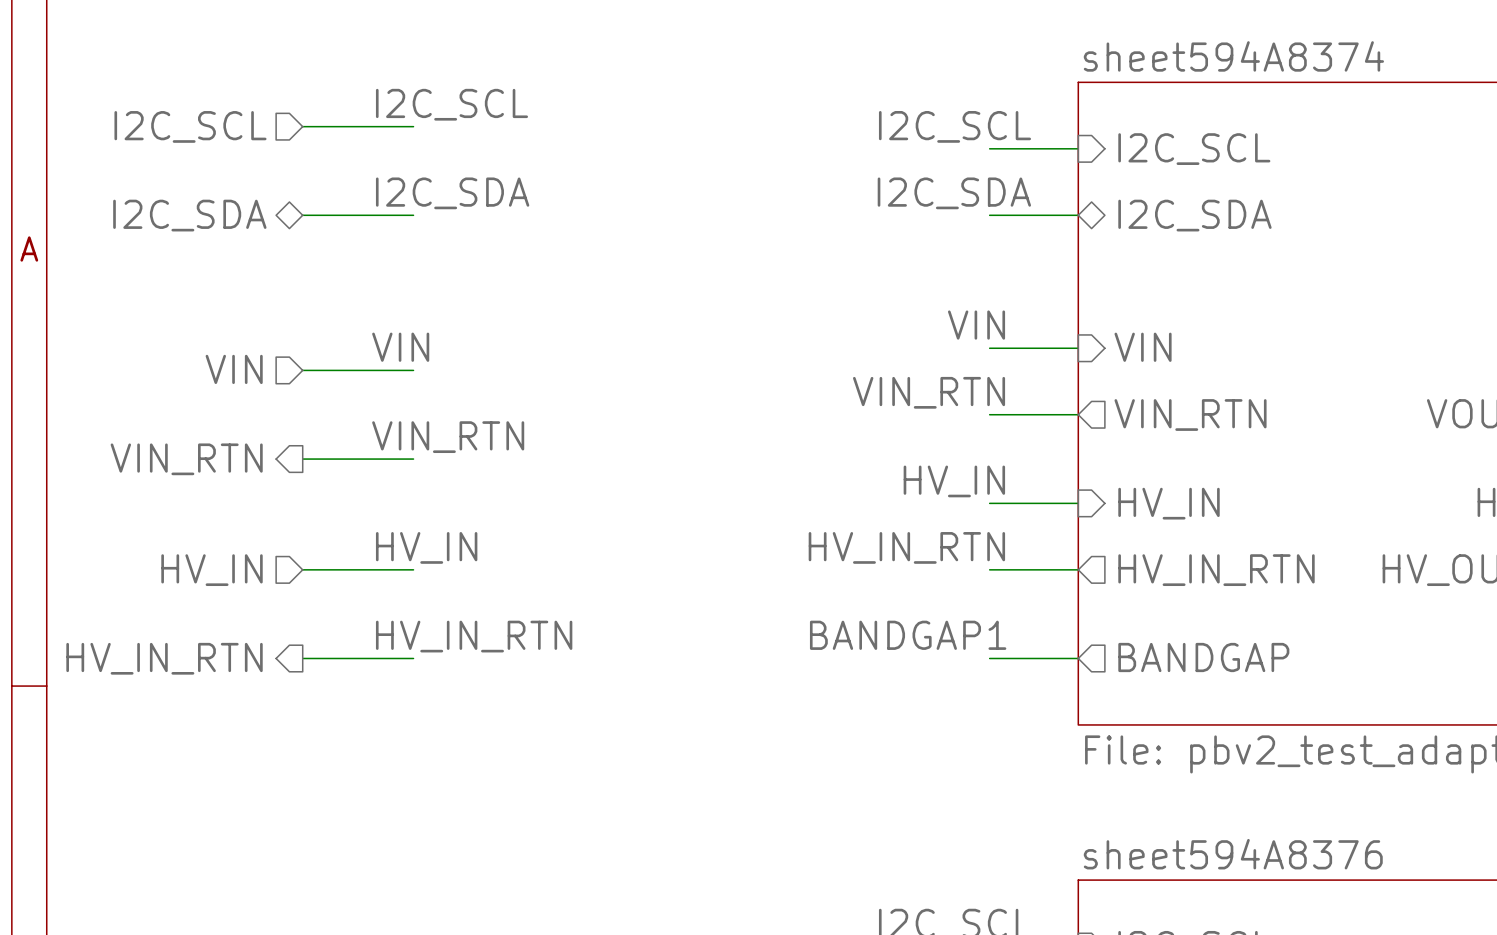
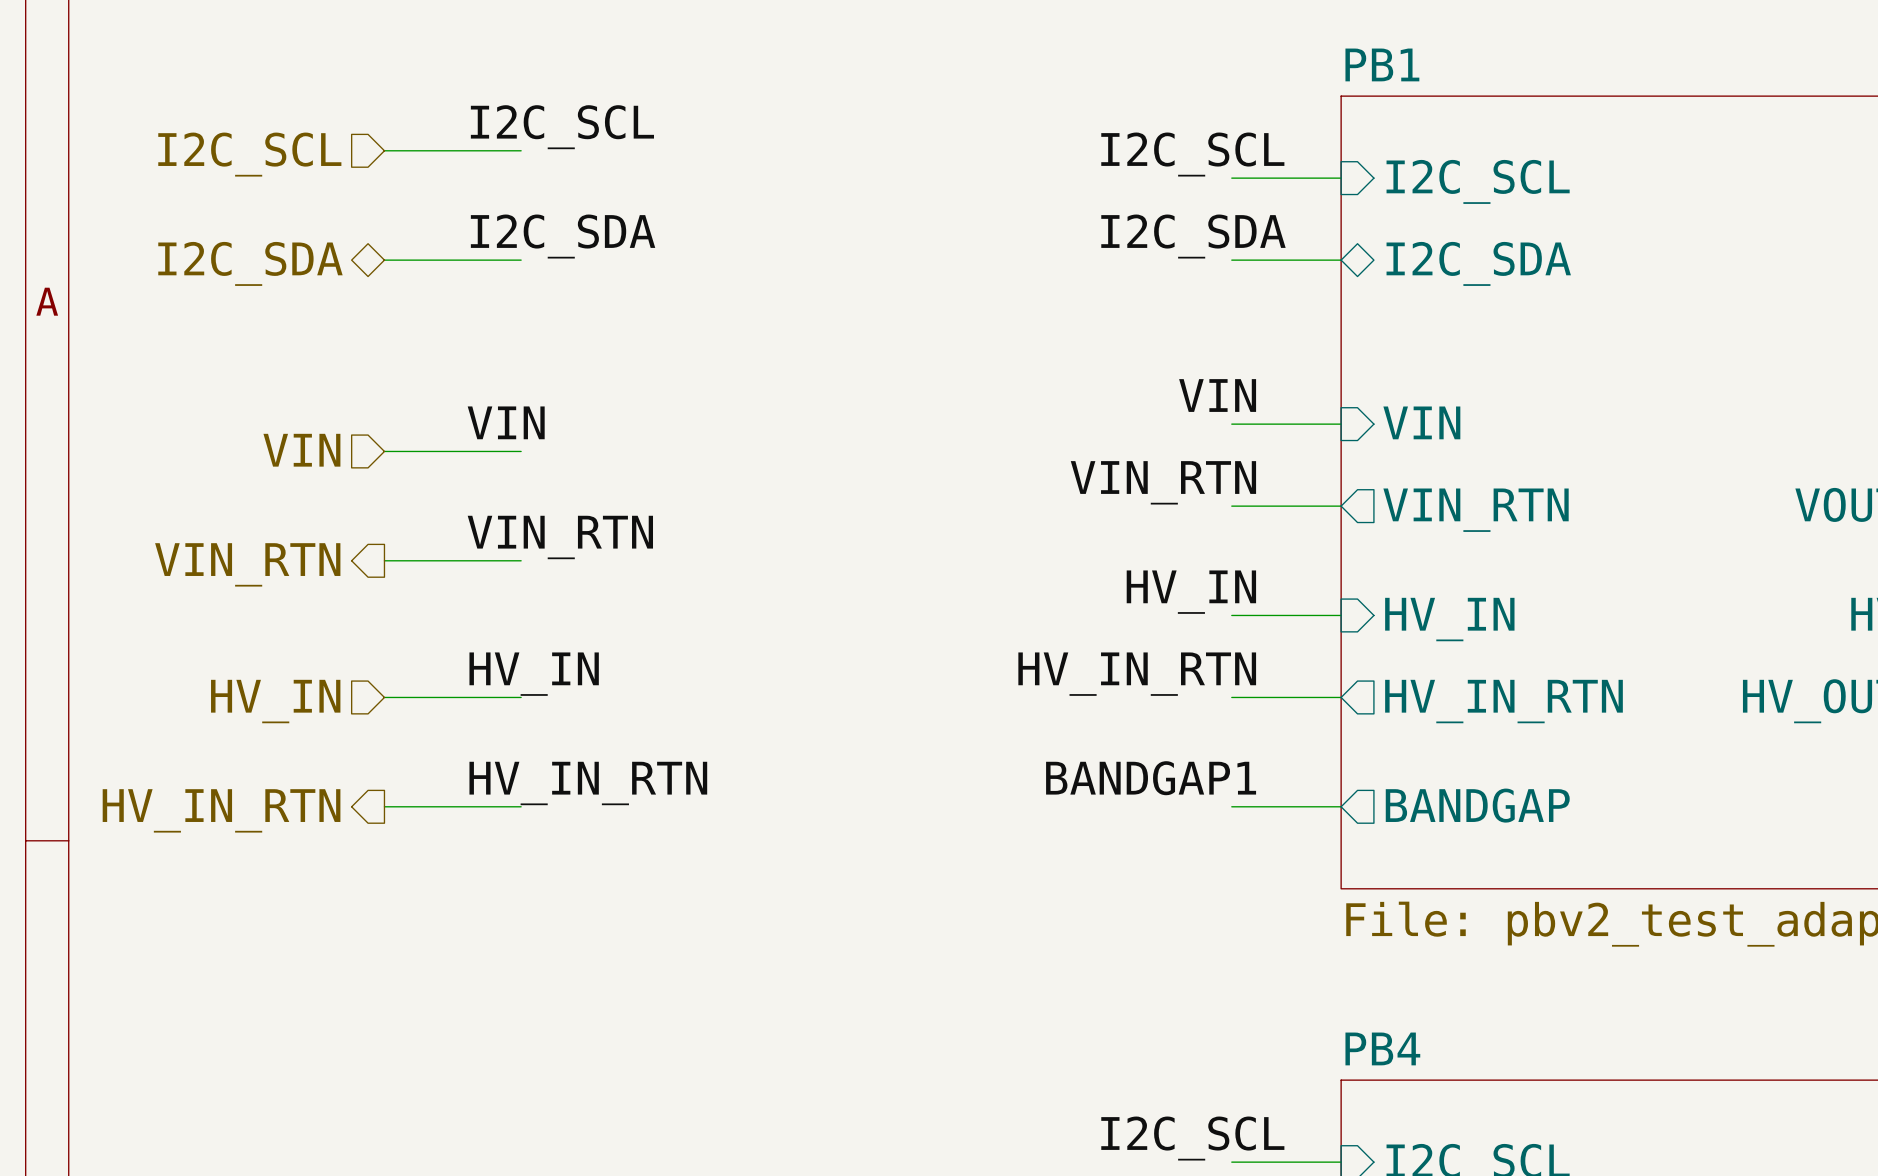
sheet sheet594A8374 name: sheet594A8374 (1233, 56) -> PB1 (1382, 64)
sheet sheet594A8376 name: sheet594A8376 (1233, 854) -> PB4 (1382, 1048)

